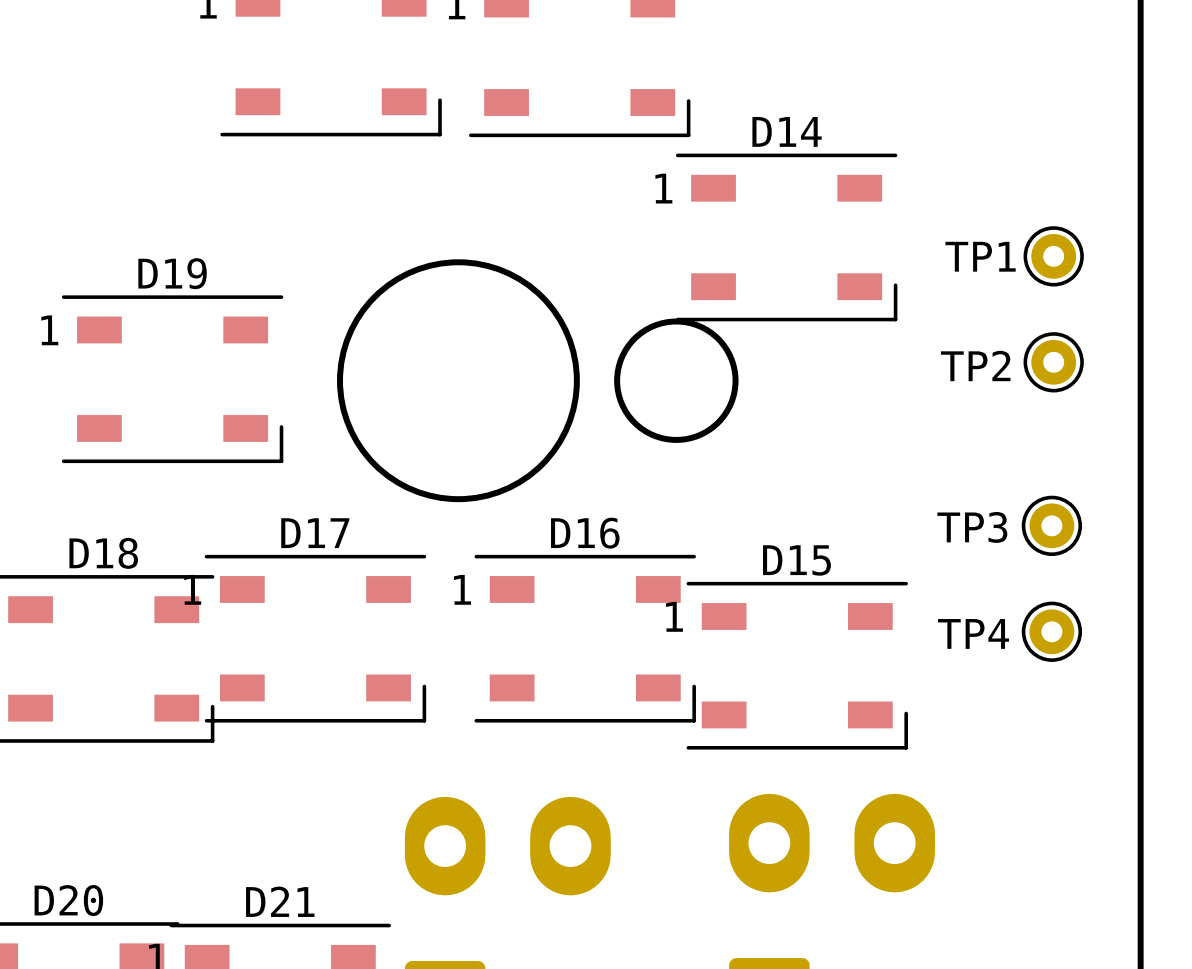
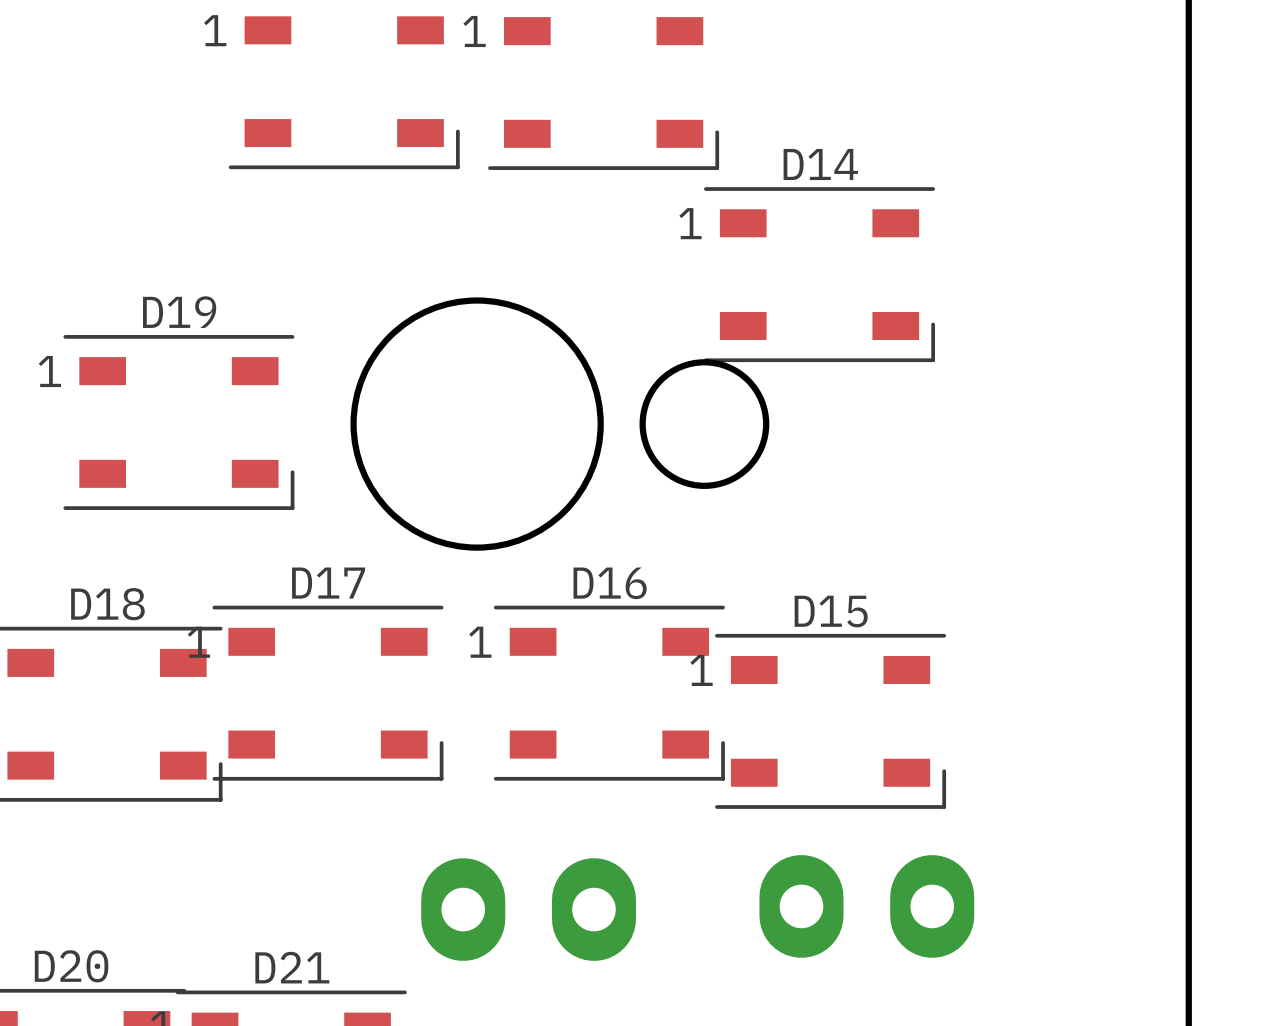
part: (1053, 256) -> none
part: (1053, 362) -> none
part: (1051, 525) -> none
part: (1051, 631) -> none

